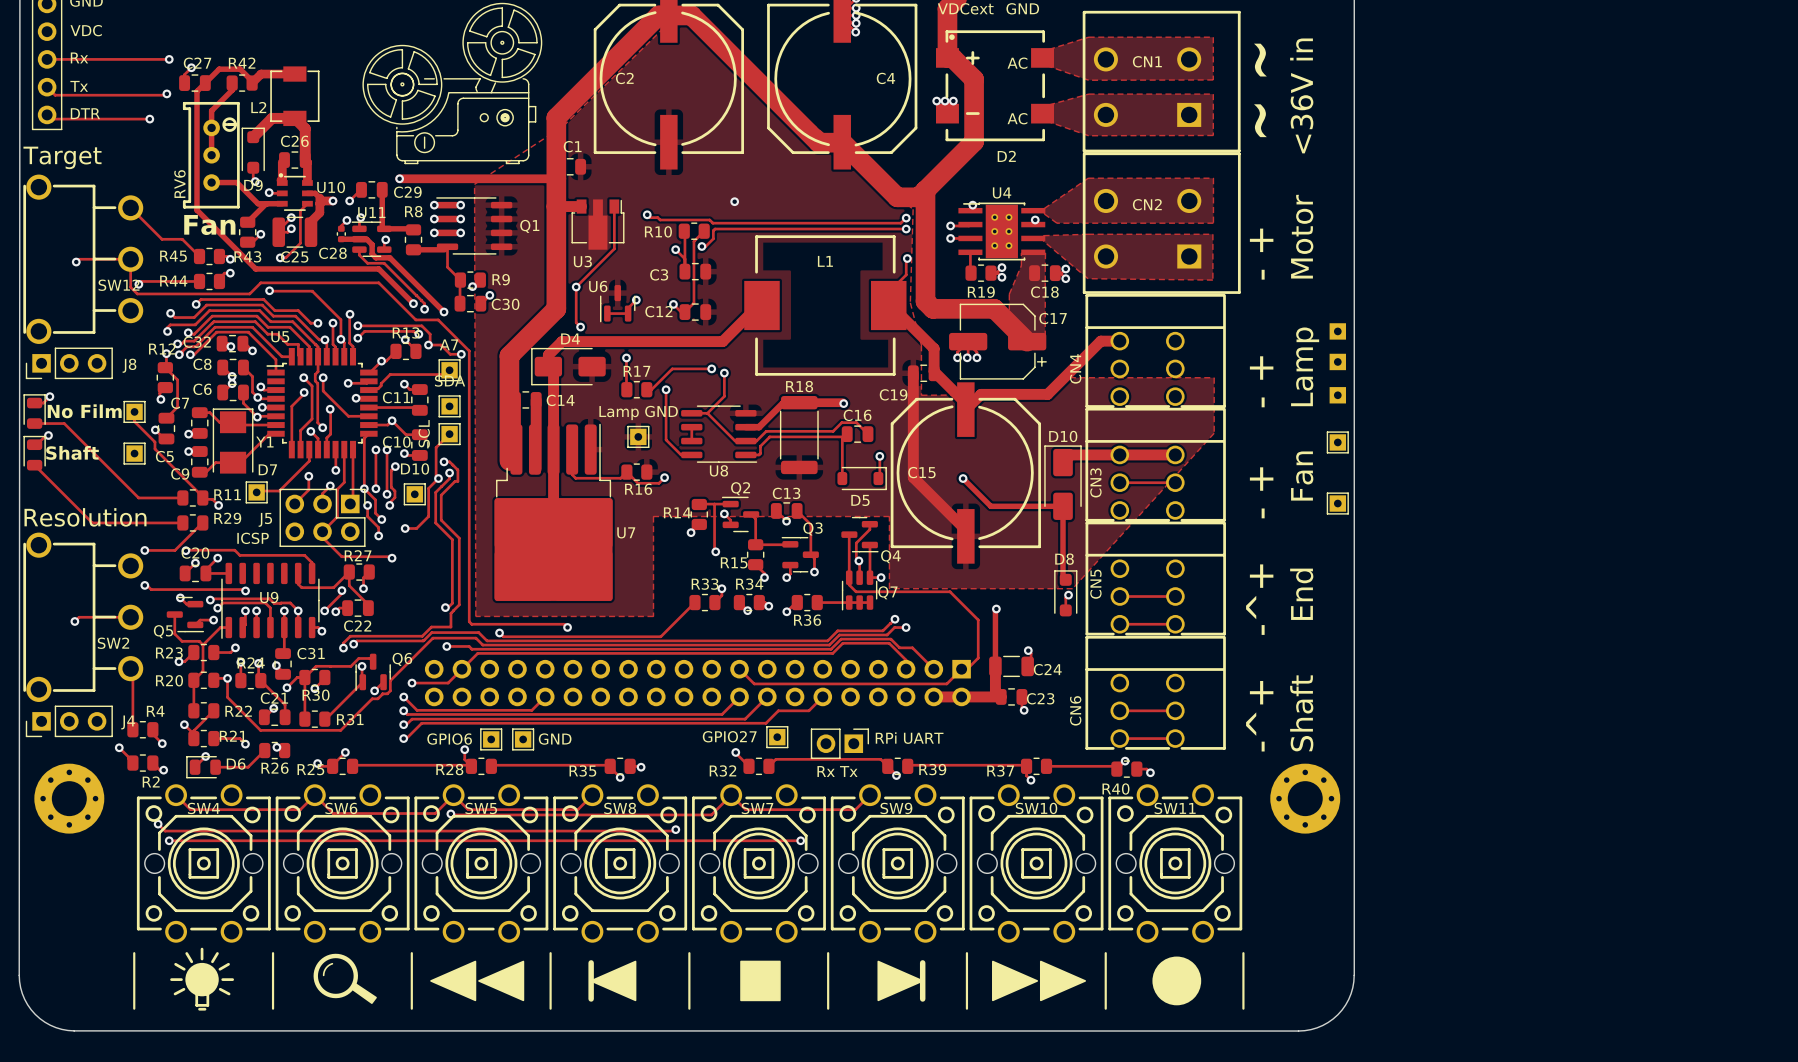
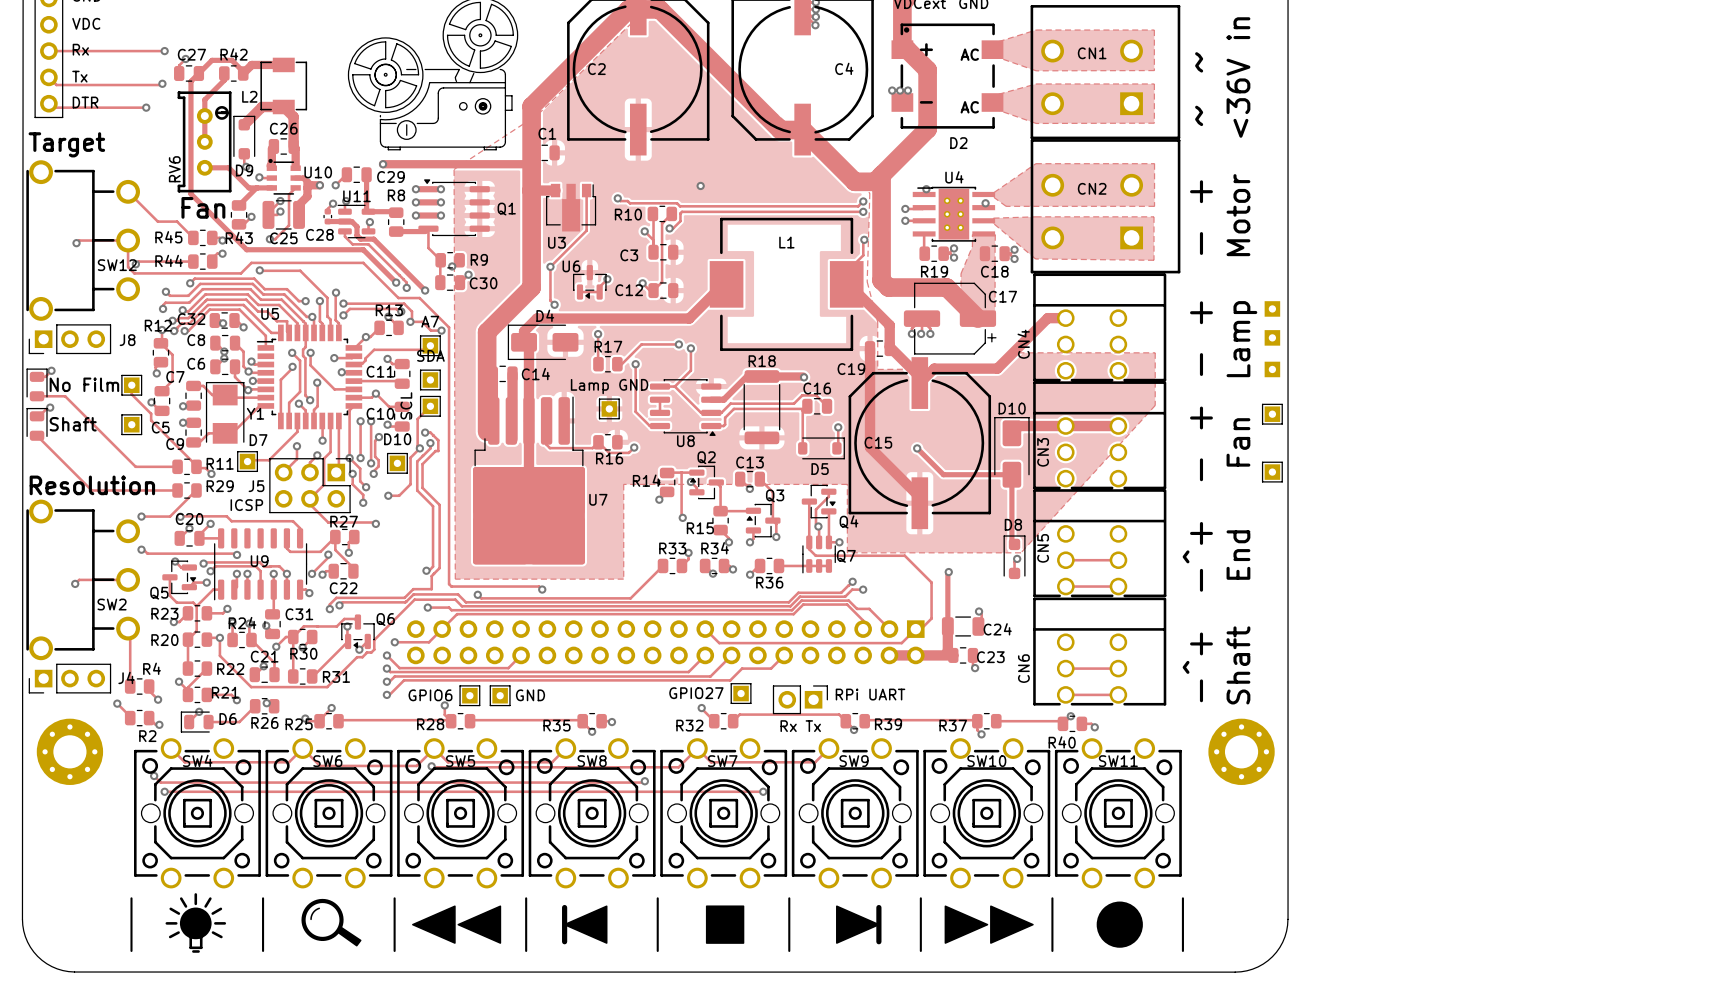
Q1 footprint: [436, 197, 513, 255] -> [418, 179, 490, 237]
U6 footprint: [600, 285, 636, 323] -> [573, 264, 607, 300]
via: (340, 339) -> none
U8 footprint: [681, 405, 758, 463] -> [649, 379, 722, 436]
track: (1119, 482) (1175, 482) -> none
Q2 footprint: [721, 496, 760, 533] -> [689, 465, 724, 500]
Q4 footprint: [841, 516, 879, 553] -> [801, 484, 837, 519]
Q3 footprint: [781, 537, 819, 573] -> [745, 503, 781, 538]
Q5 footprint: [166, 596, 205, 633] -> [162, 560, 197, 595]
Q6 footprint: [355, 653, 391, 691] -> [341, 614, 375, 650]

